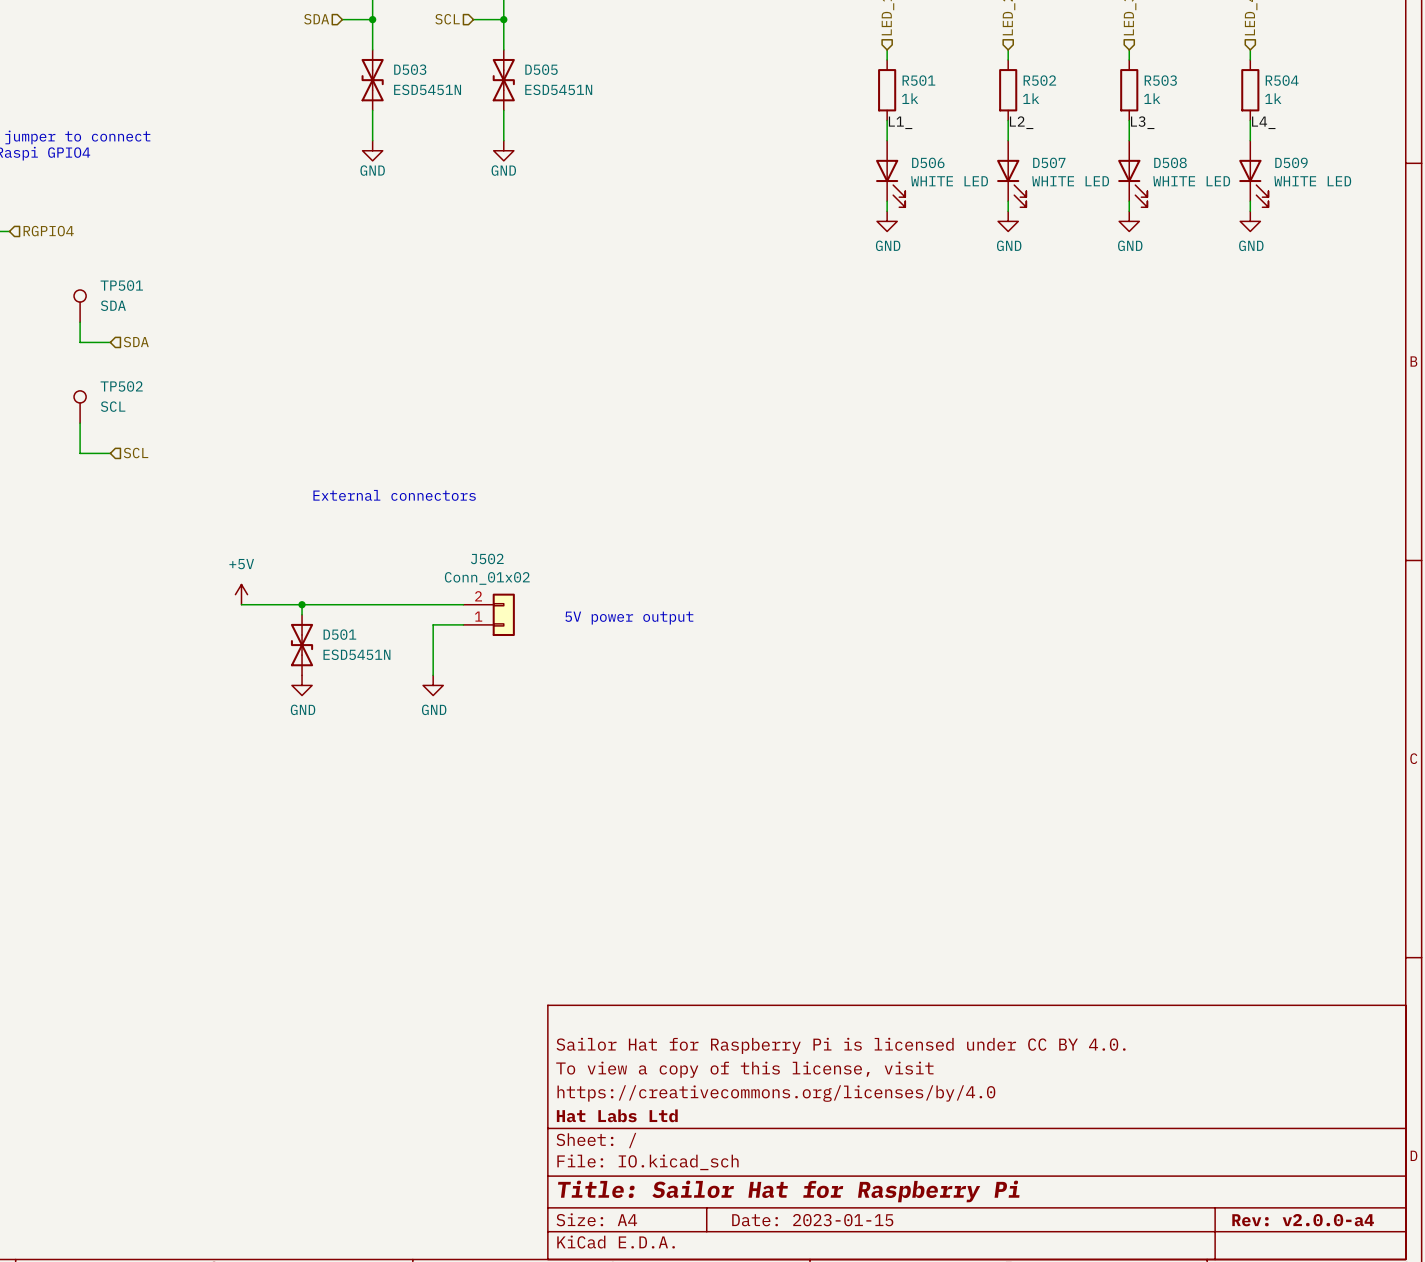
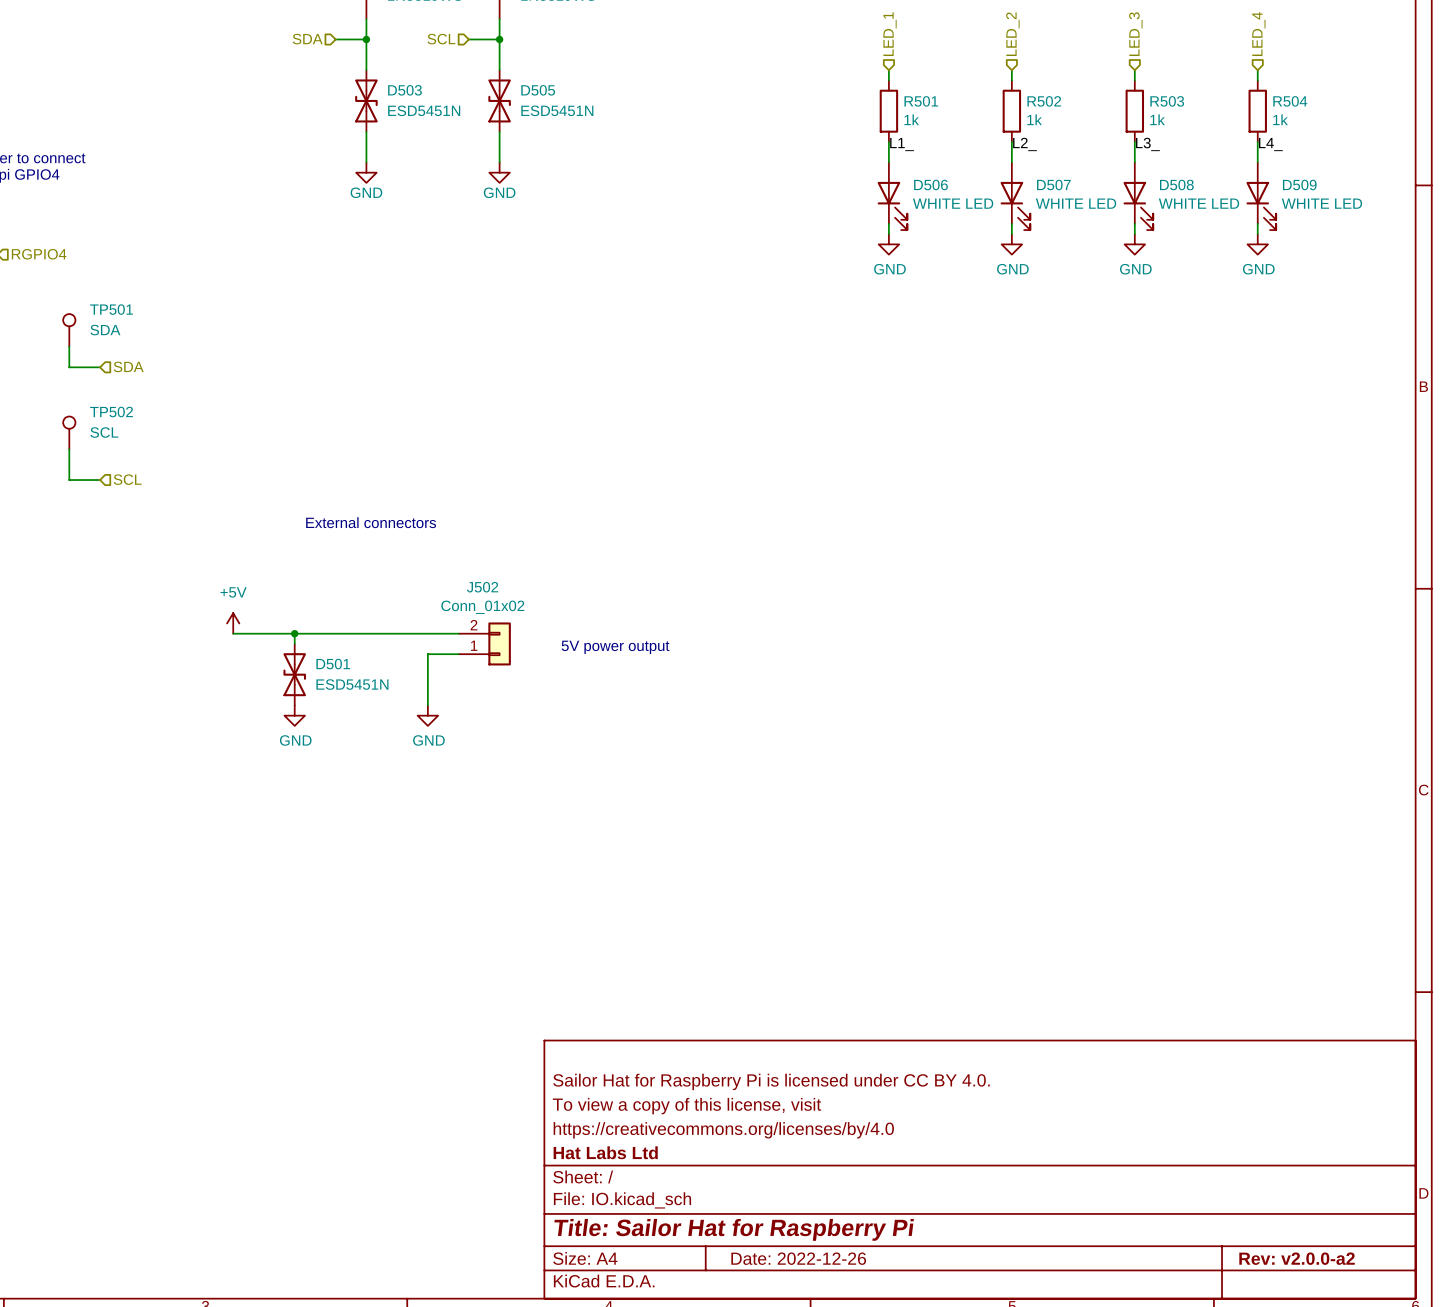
title block: Date: 2023-01-15 (812, 1220) -> Date: 2022-12-26 (798, 1258)
title block: Rev: v2.0.0-a4 (1303, 1220) -> Rev: v2.0.0-a2 (1297, 1258)

